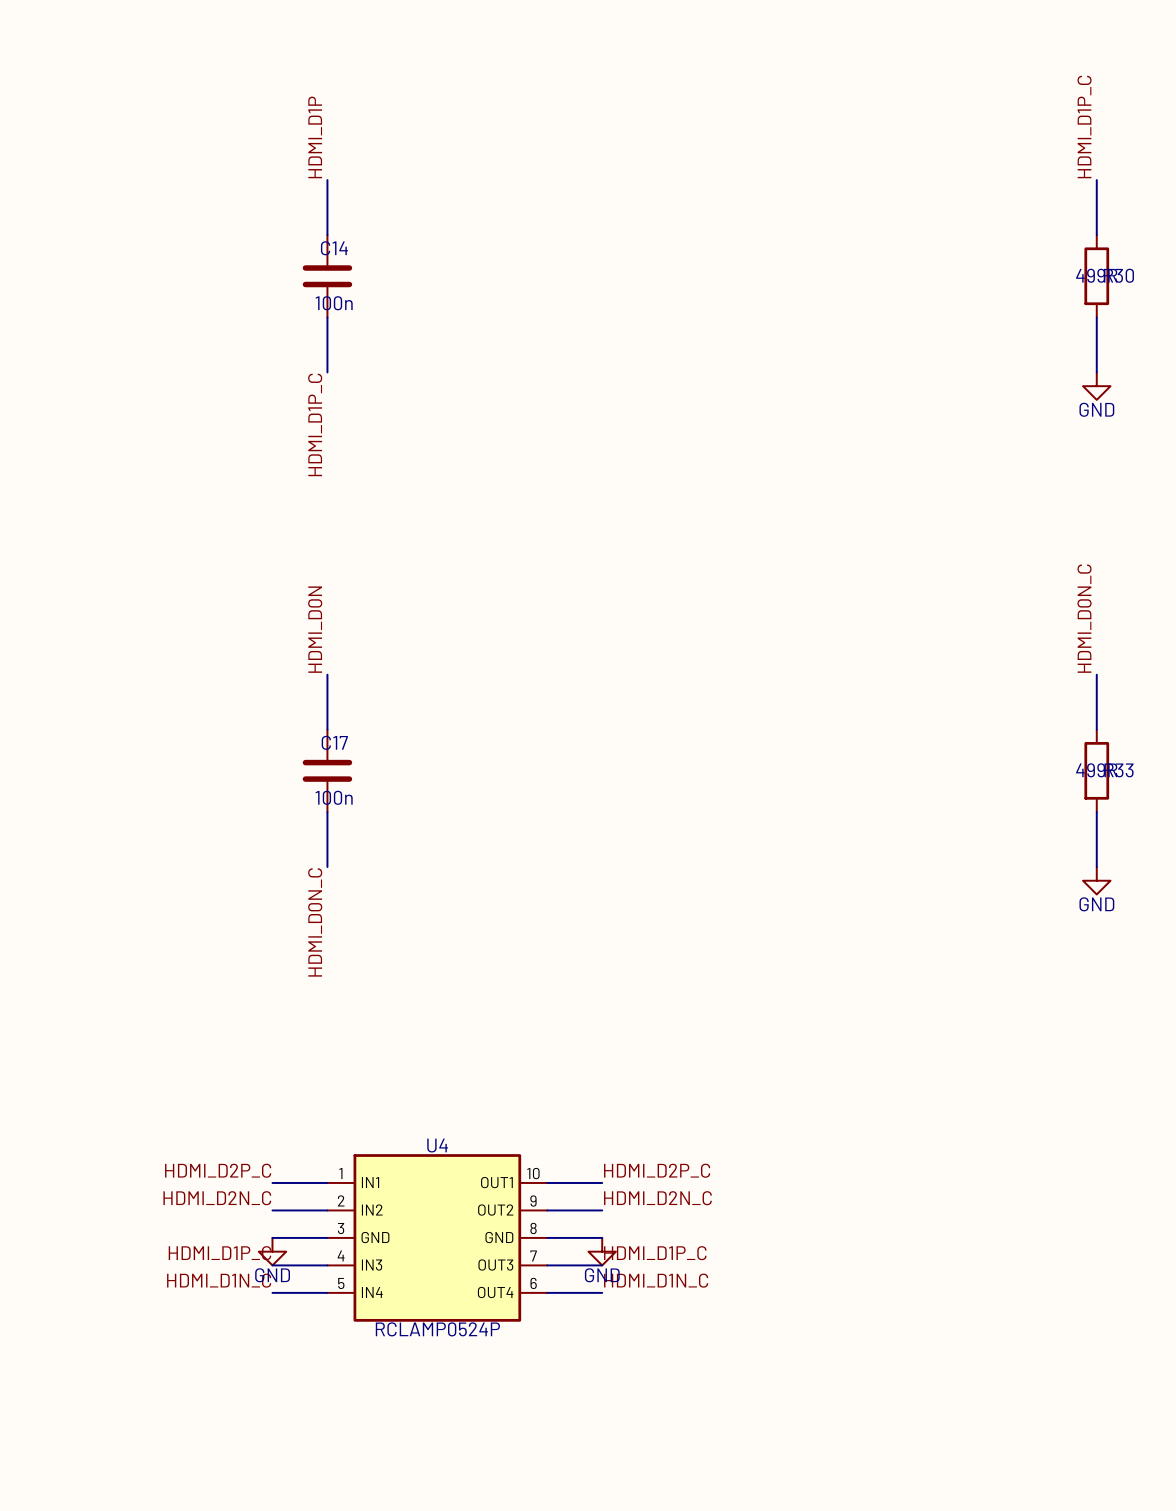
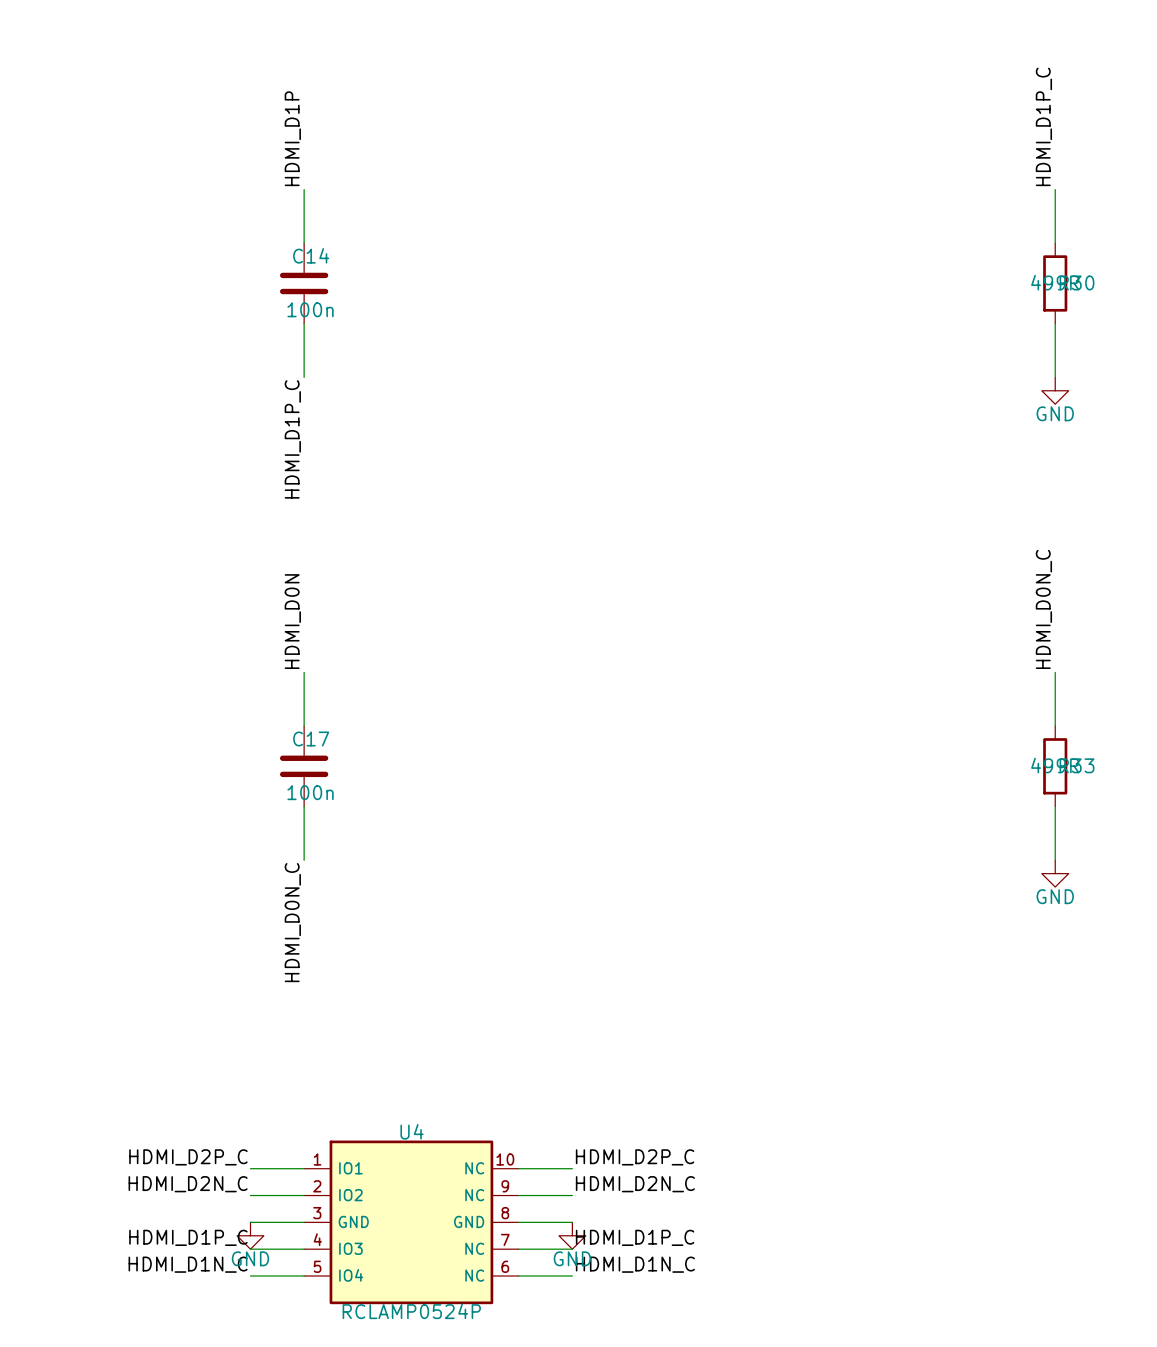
U4 pin name: IN1 (370, 1182) -> IO1 (350, 1168)
U4 pin name: OUT1 (496, 1182) -> NC (474, 1168)
U4 pin name: IN2 (372, 1209) -> IO2 (350, 1195)
U4 pin name: OUT2 (495, 1210) -> NC (474, 1195)
U4 pin name: IN3 (372, 1265) -> IO3 (350, 1248)
U4 pin name: OUT3 (495, 1265) -> NC (474, 1248)
U4 pin name: IN4 (372, 1292) -> IO4 (351, 1275)
U4 pin name: OUT4 (495, 1292) -> NC (474, 1275)

